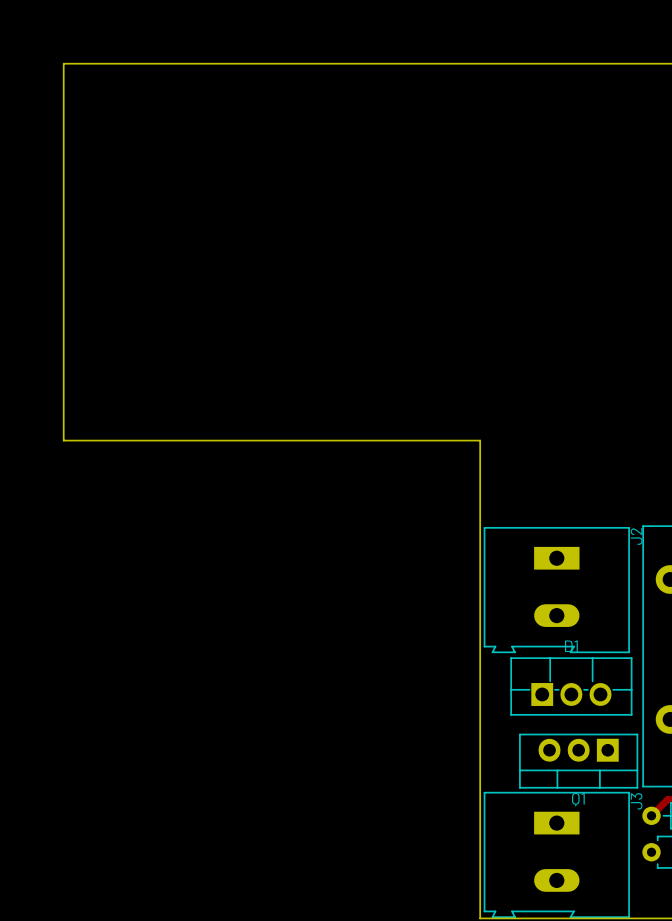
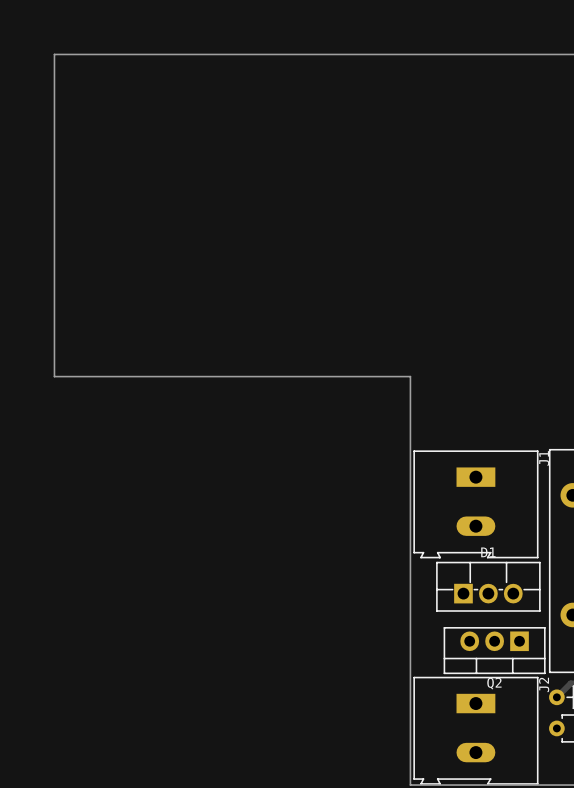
J2 name: J2 (636, 536) -> J1 (544, 458)
Q1 name: Q1 (578, 799) -> Q2 (494, 683)
J3 name: J3 (636, 801) -> J2 (544, 684)

